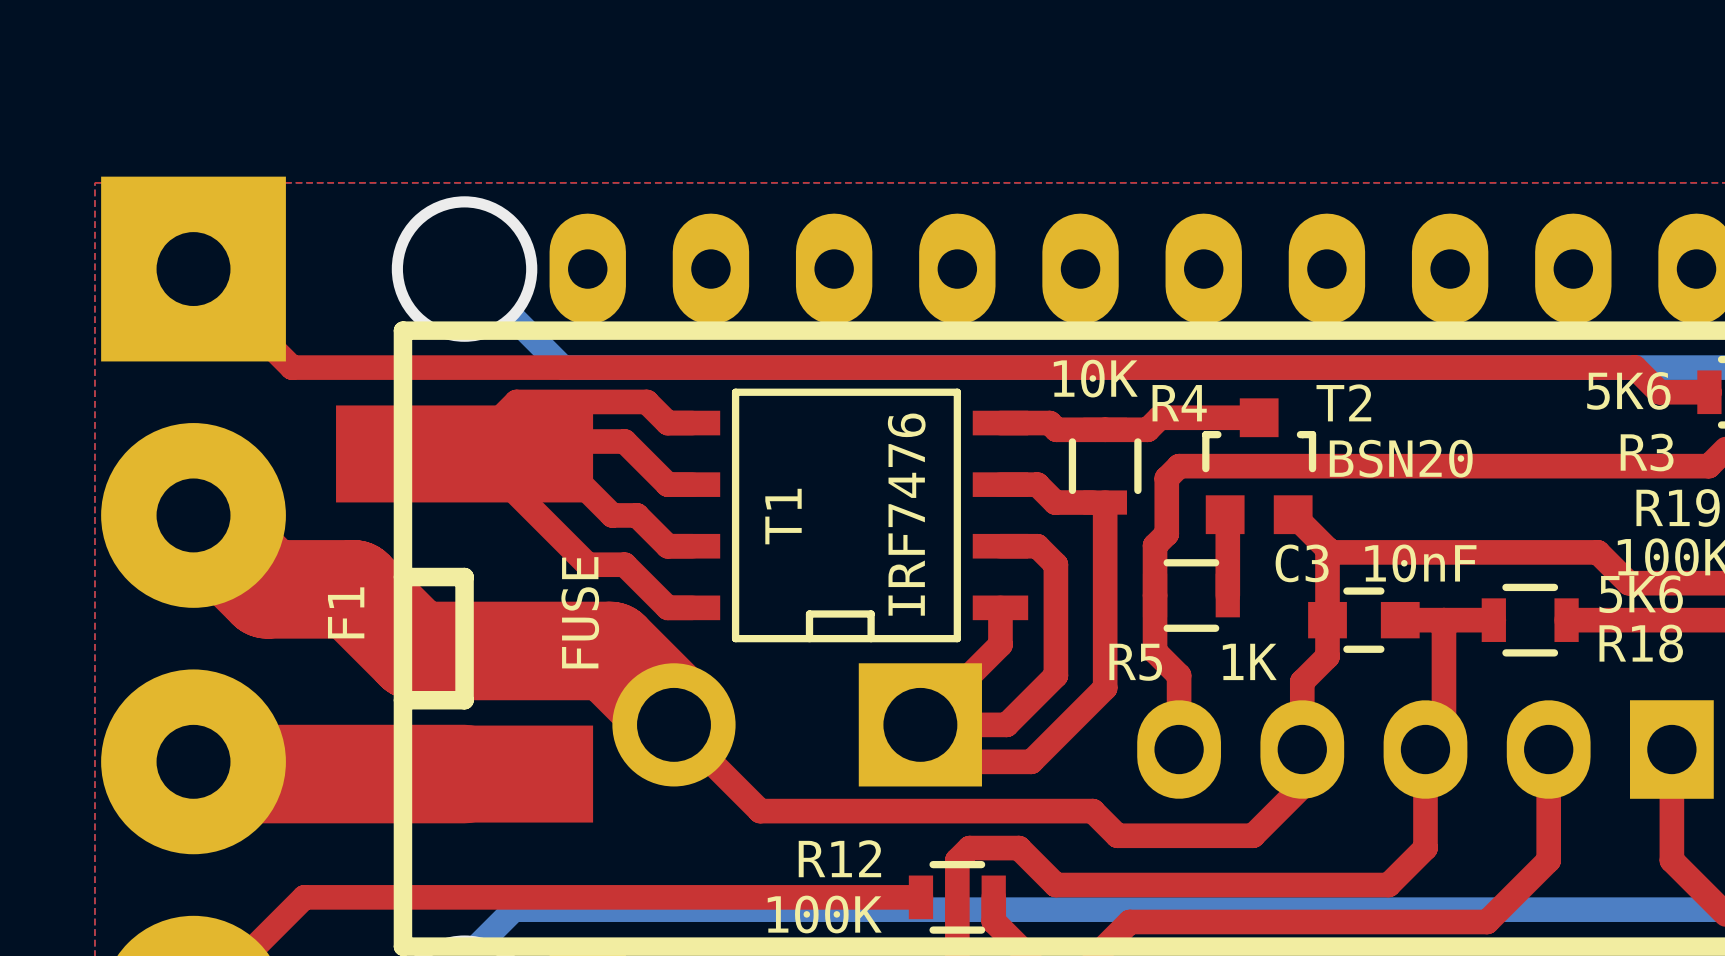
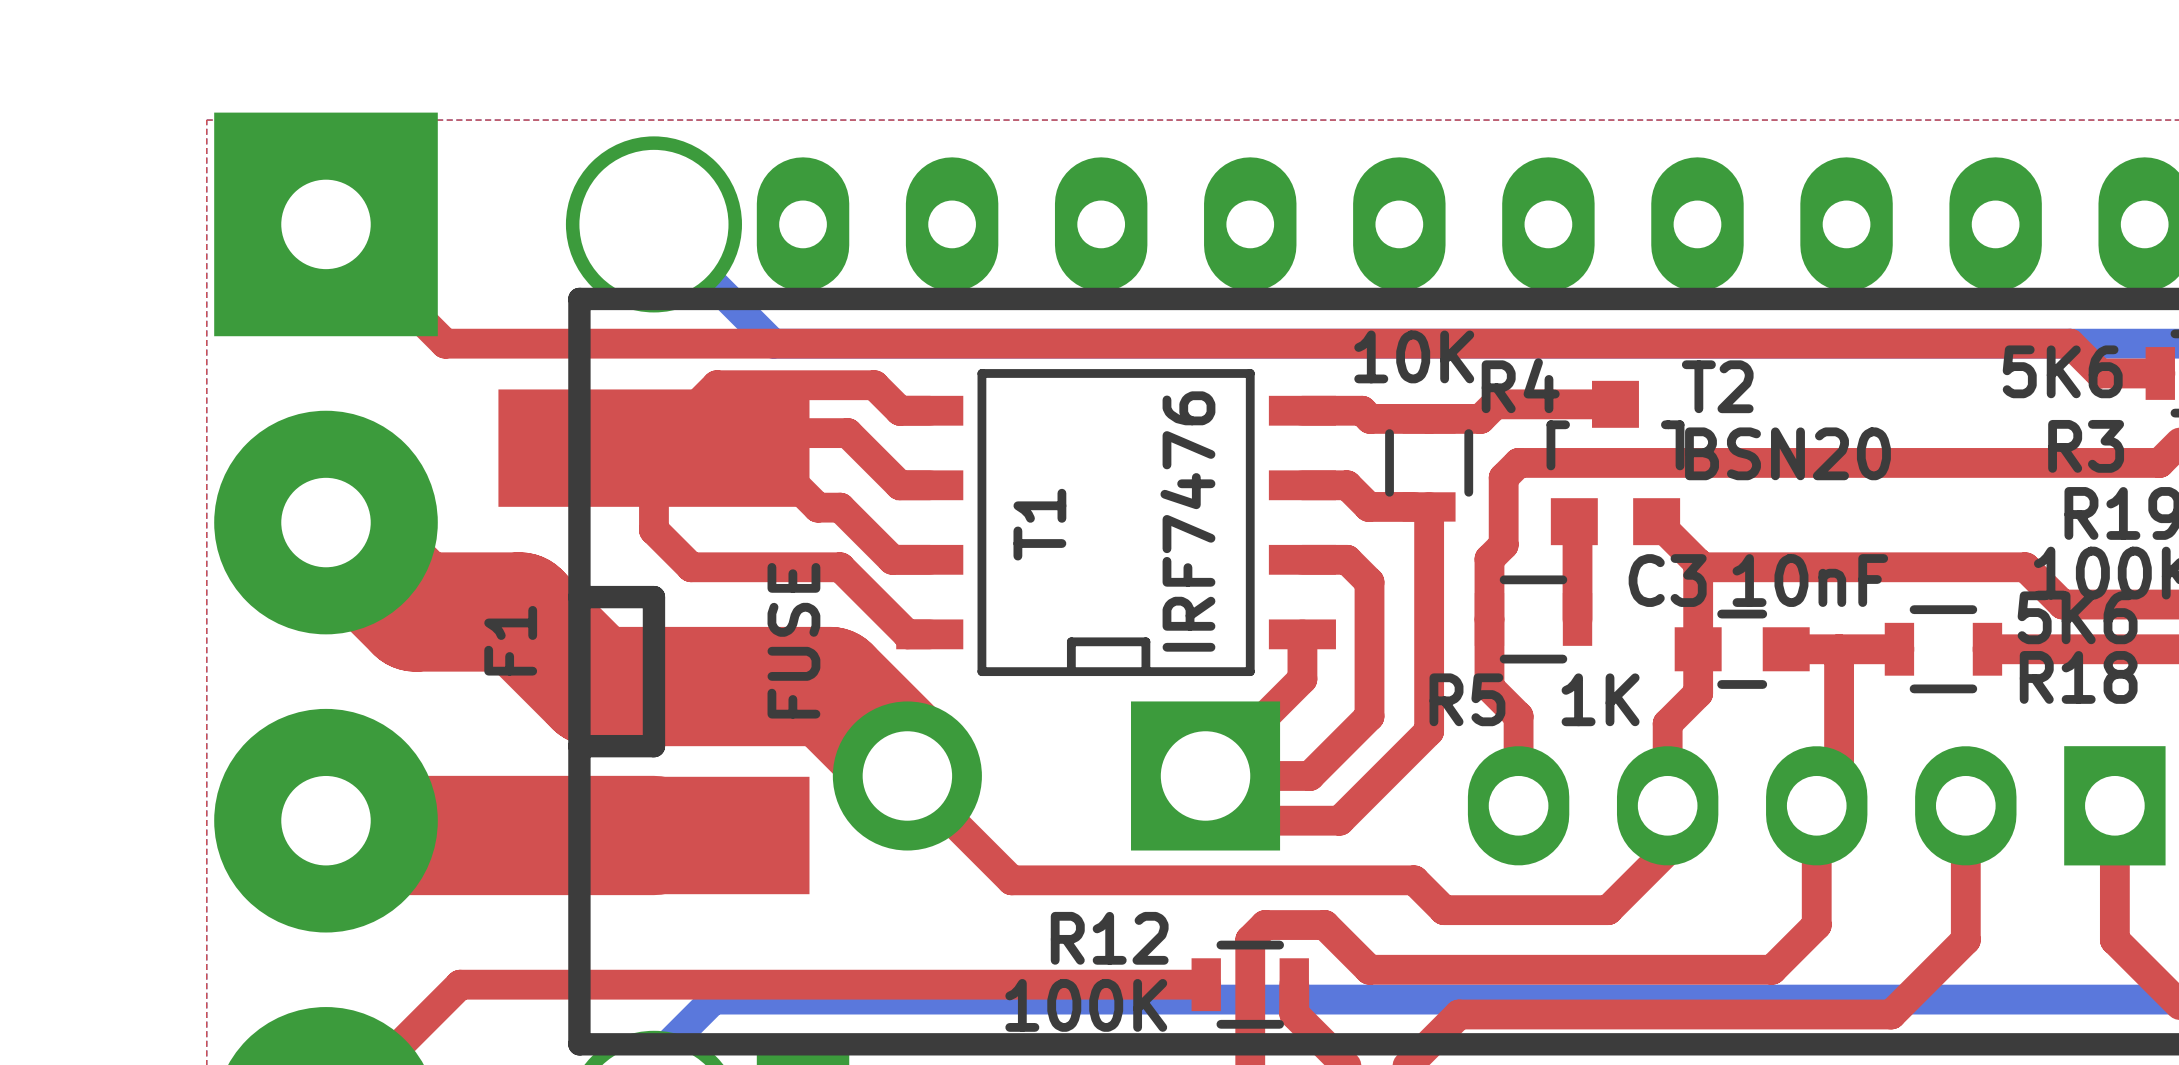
top track: (476, 453) (587, 564) (624, 564) (667, 607) (673, 607) -> (653, 448) (653, 530) (691, 567) (840, 567) (907, 634)
top track: (600, 503) (612, 515) (637, 515) (667, 546) -> (817, 507) (840, 507) (892, 559) (899, 559)

